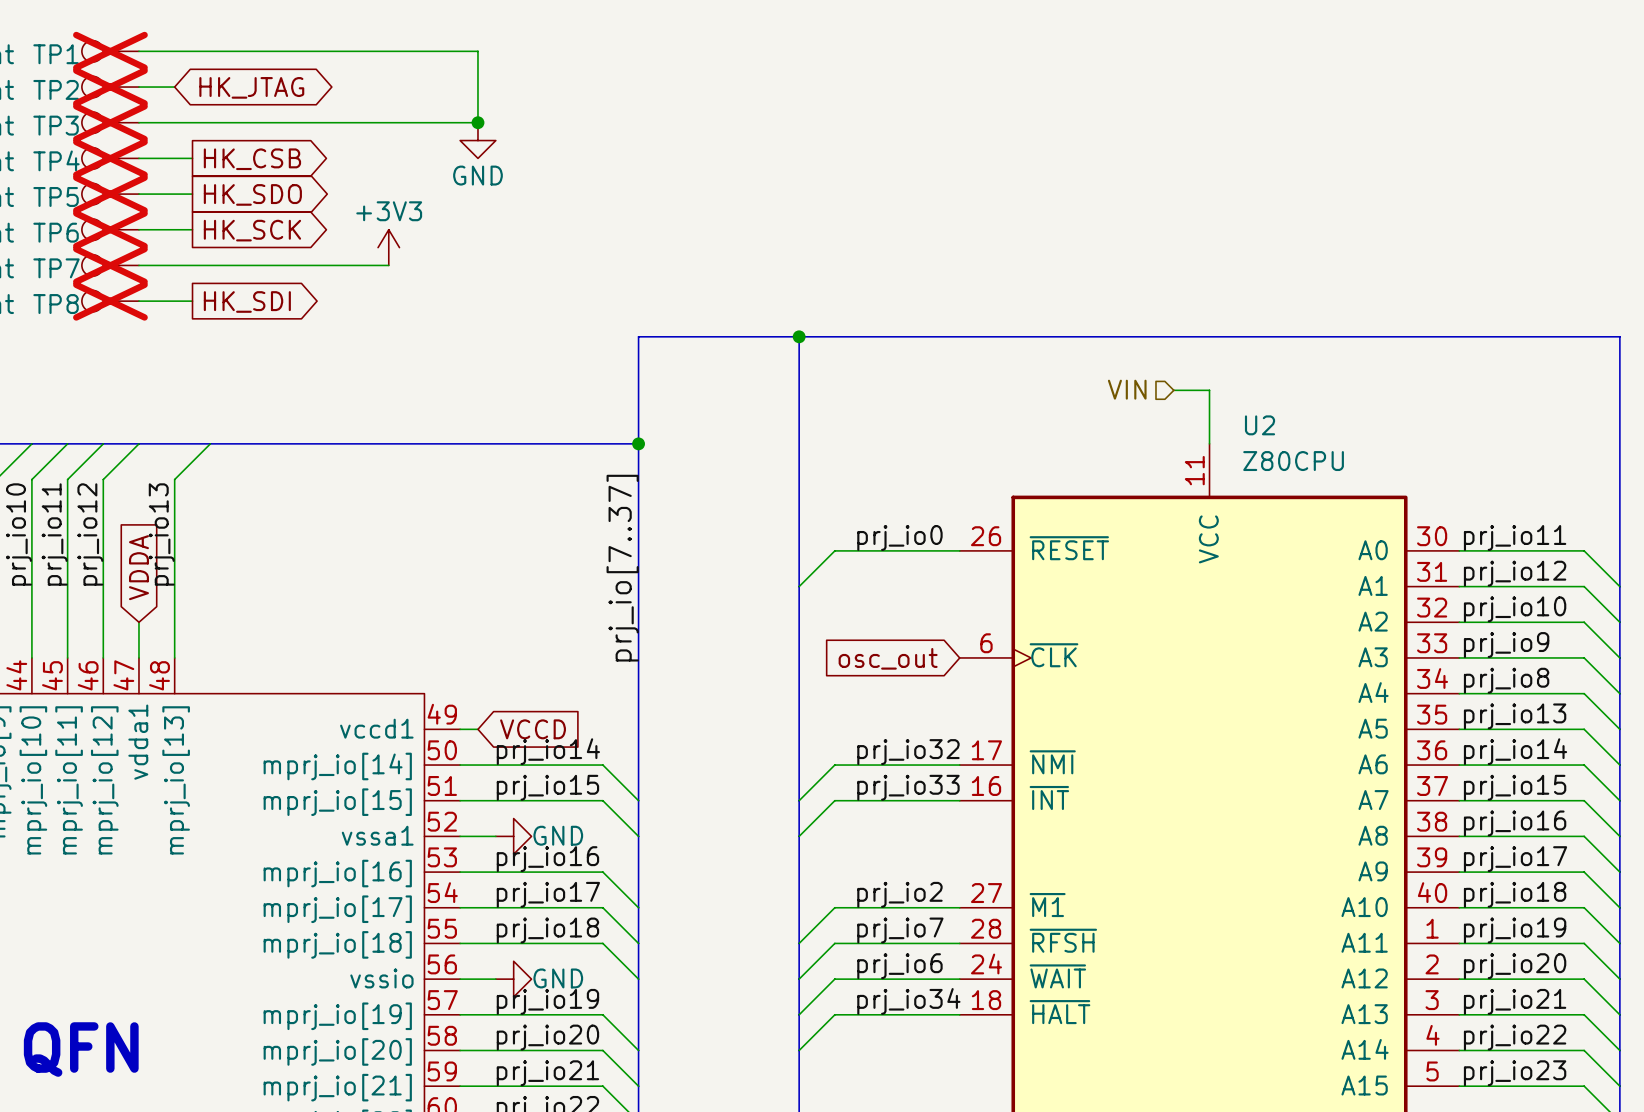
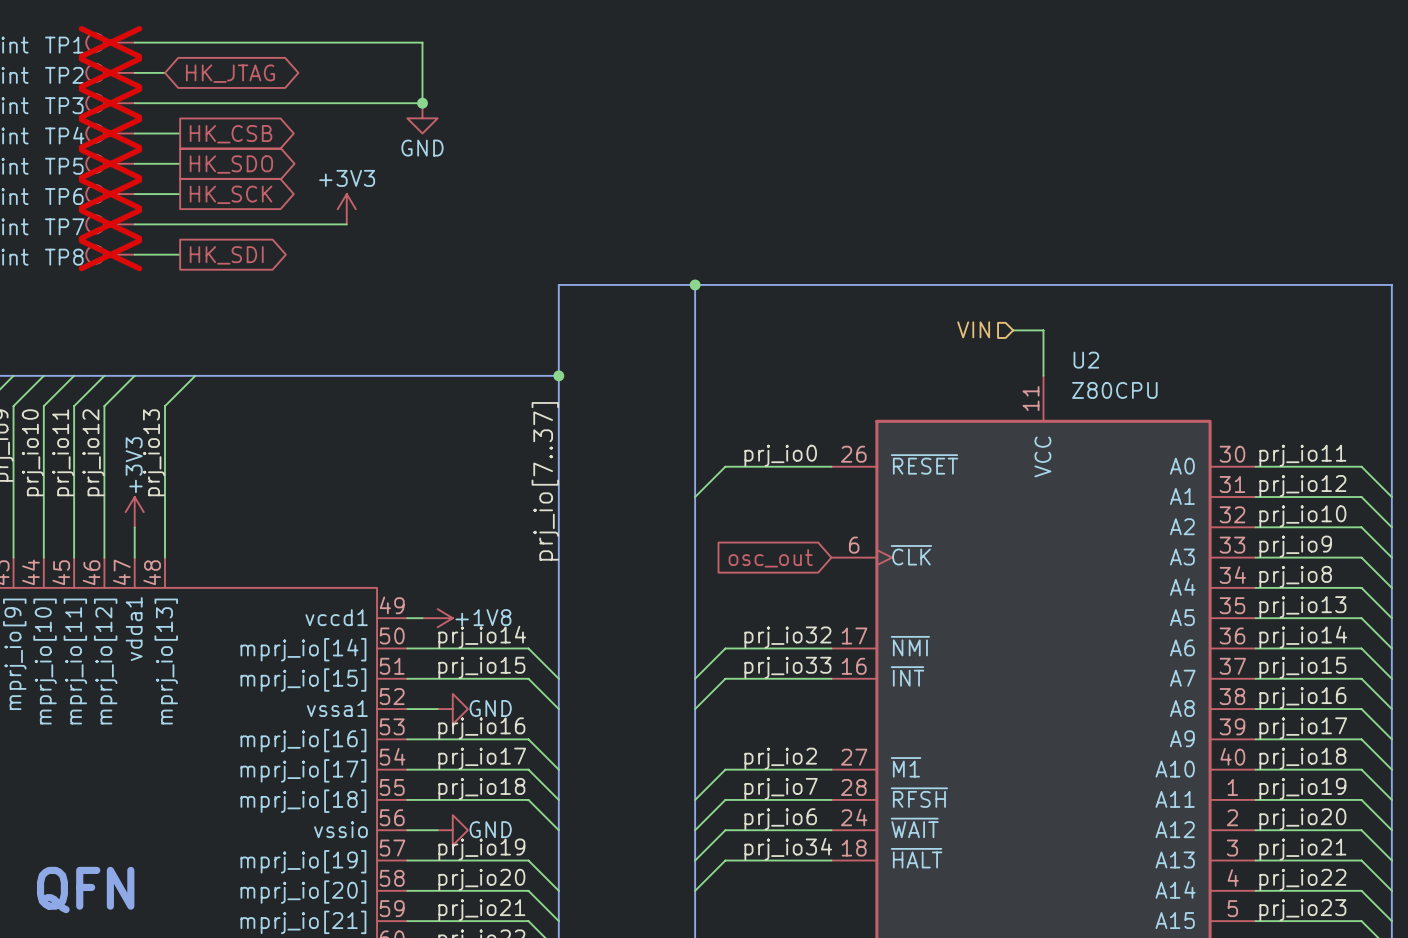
global label: VDDA (138, 567) -> none
power symbol: none -> +3V3 (134, 512)
power symbol: none -> +1V8 (437, 618)
global label: VCCD (533, 729) -> none

